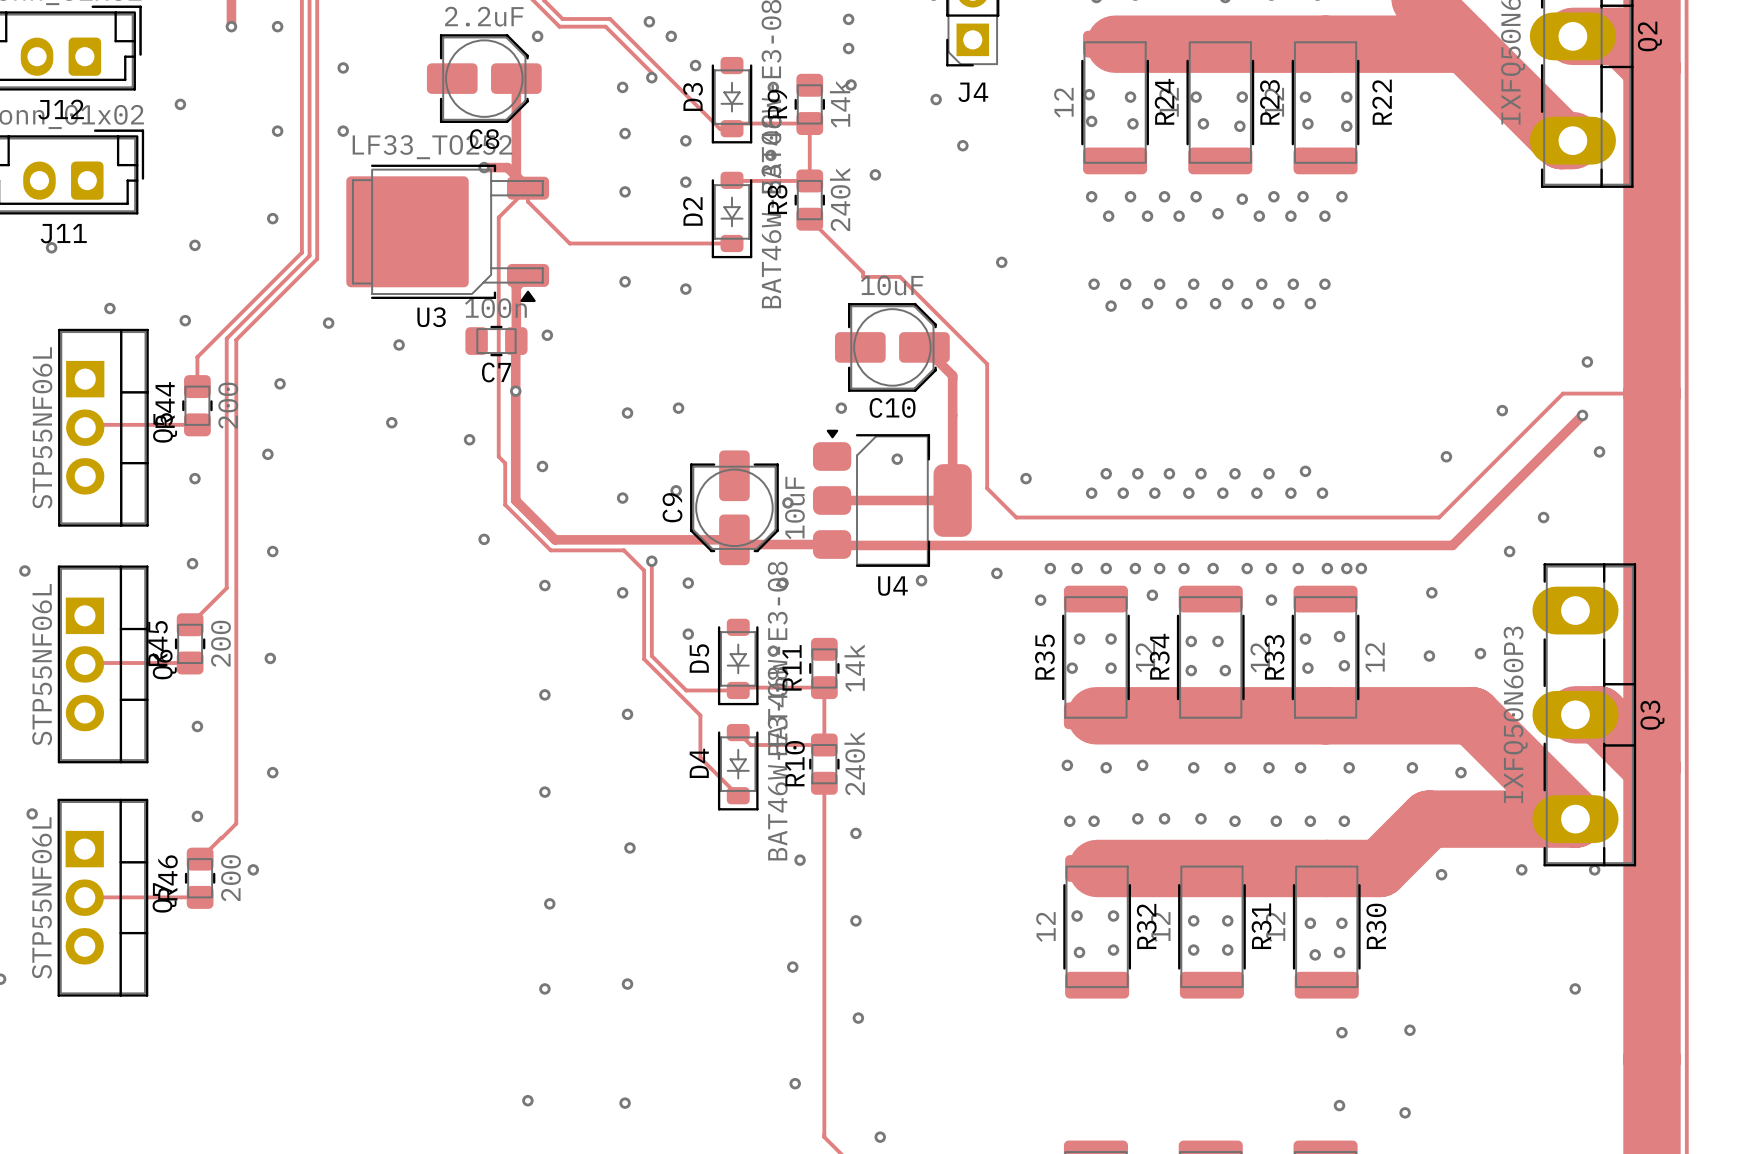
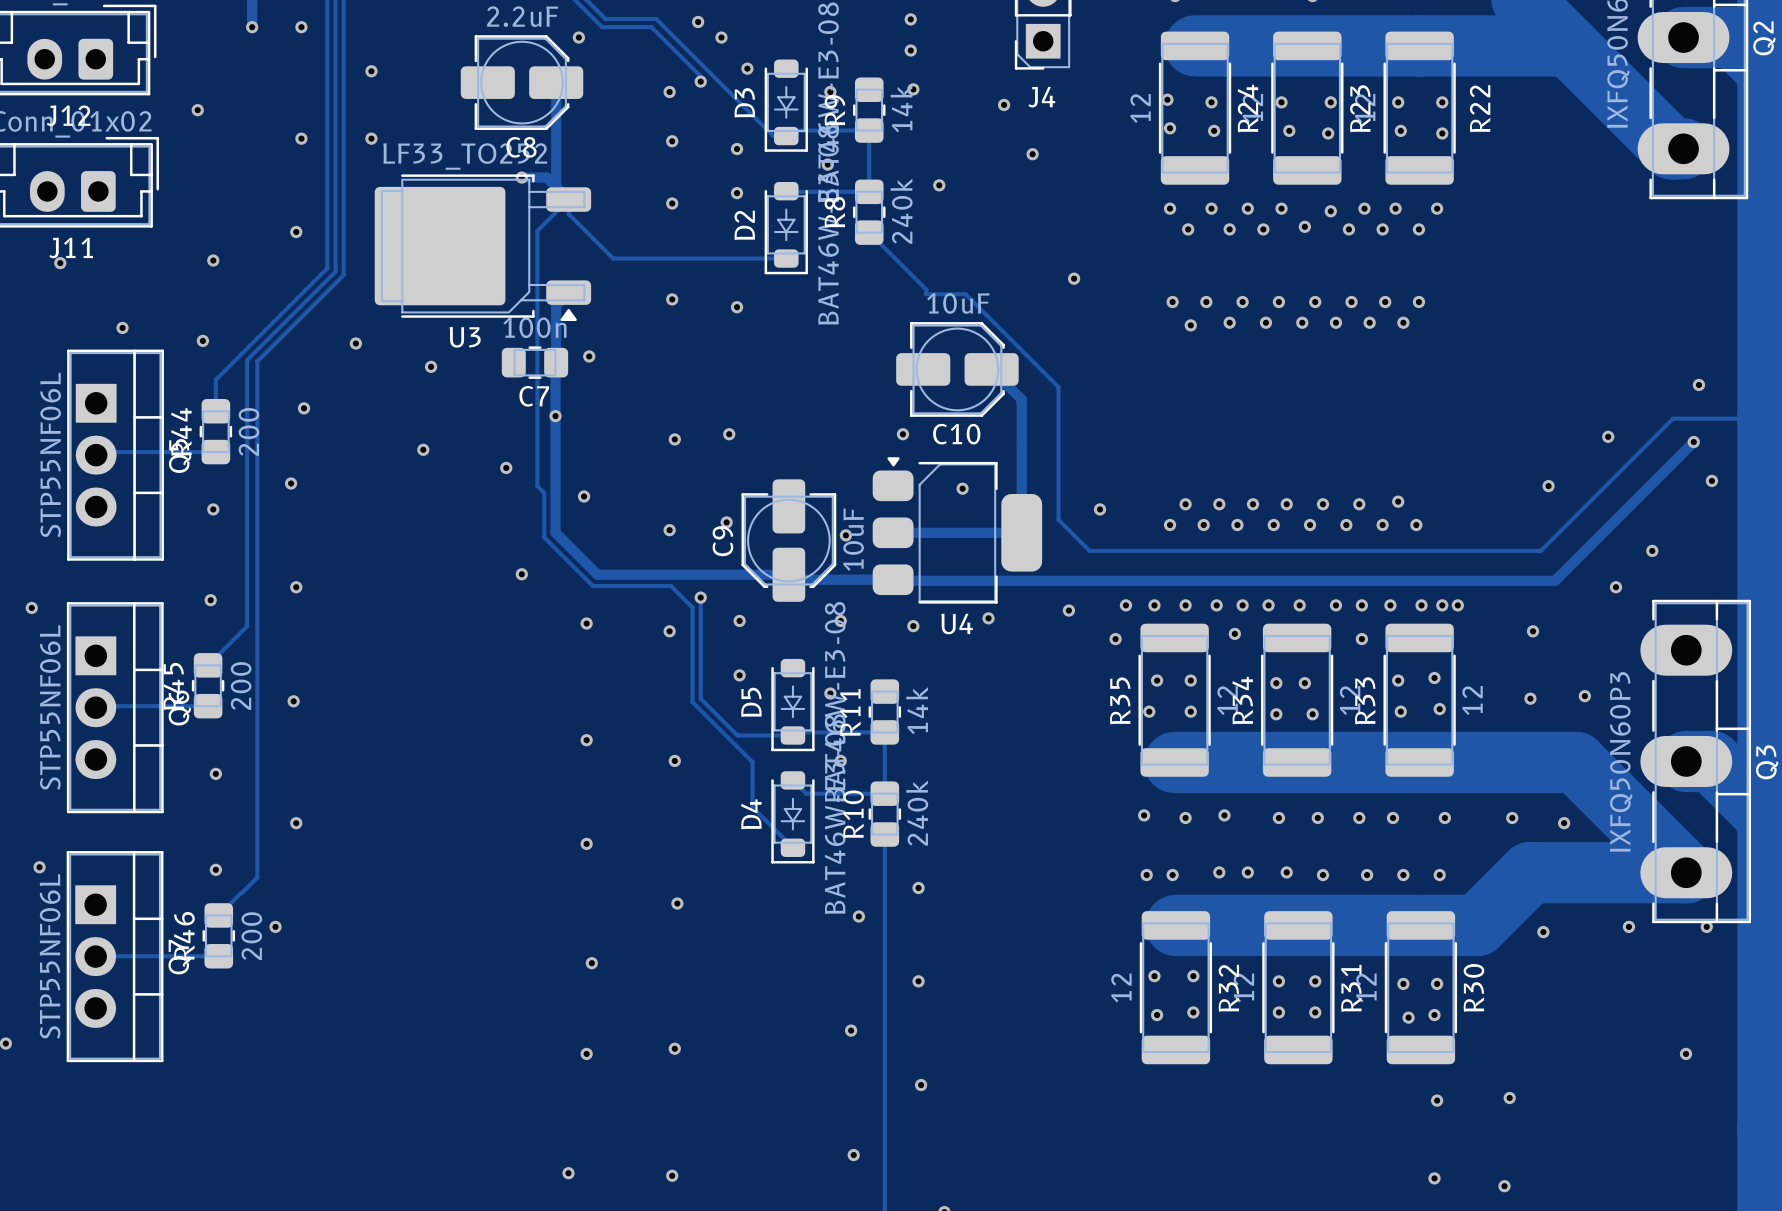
via: none -> (913, 626)
via: none -> (840, 760)

